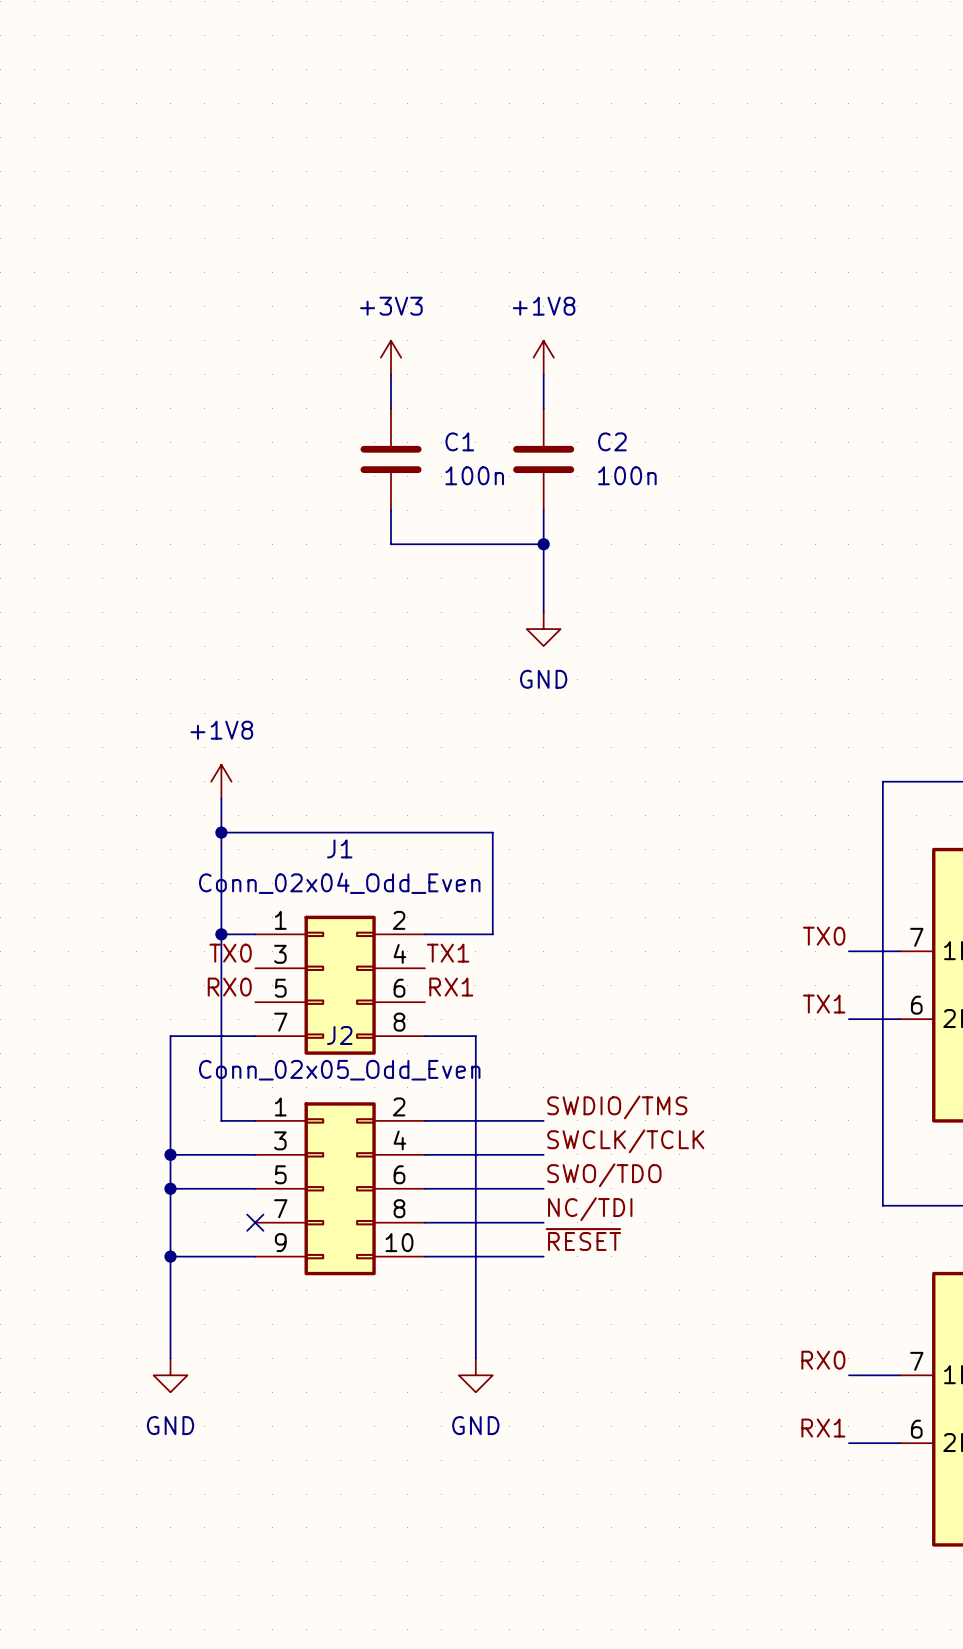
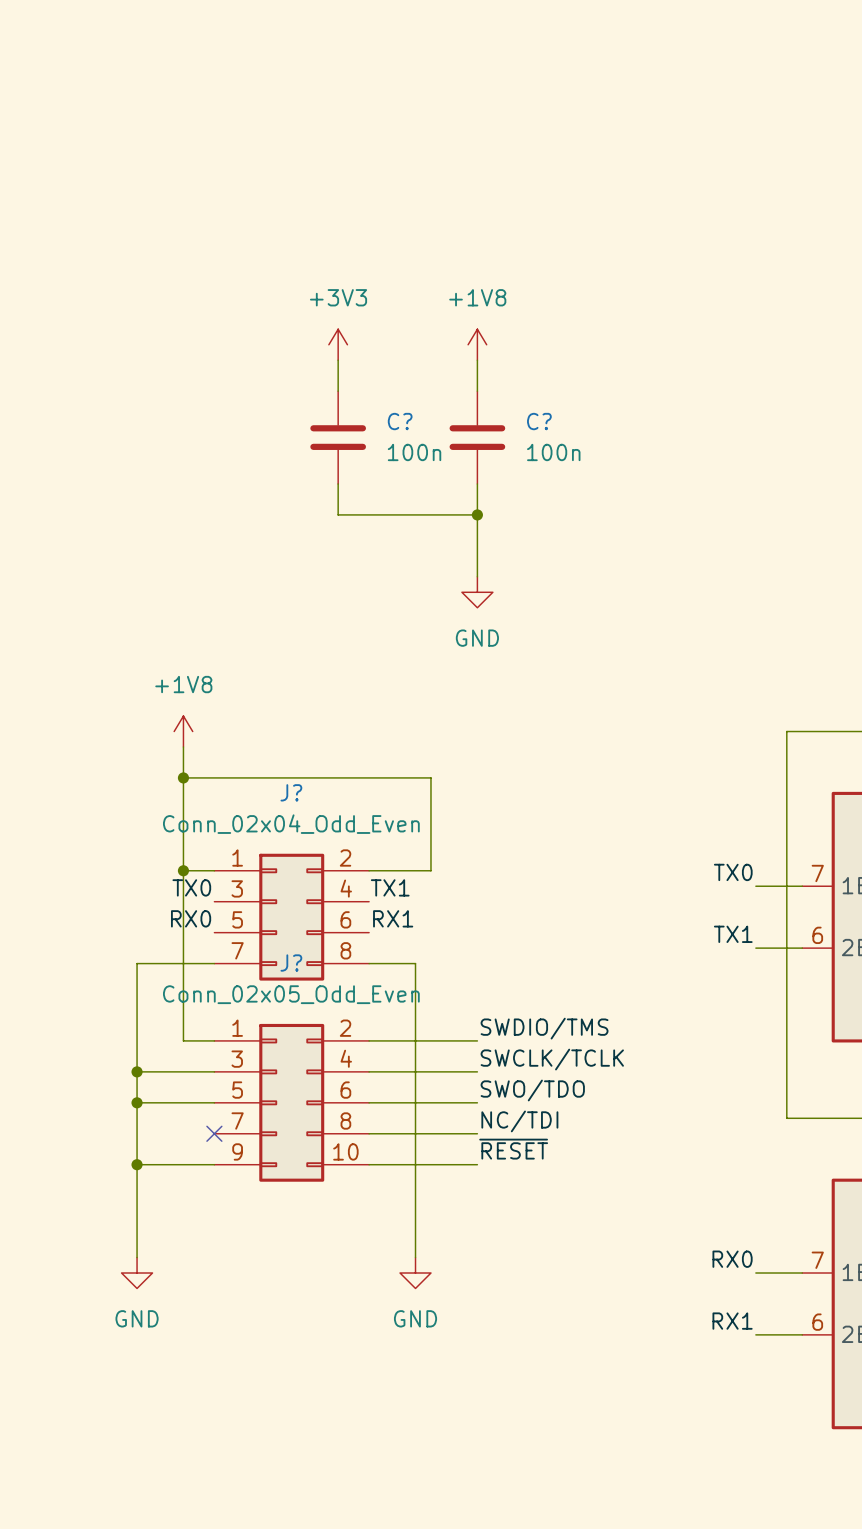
C1 name: C1 (459, 441) -> C? (400, 421)
C2 name: C2 (612, 441) -> C? (539, 421)
J1 name: J1 (339, 848) -> J? (291, 792)
J2 name: J2 (339, 1035) -> J? (291, 963)

